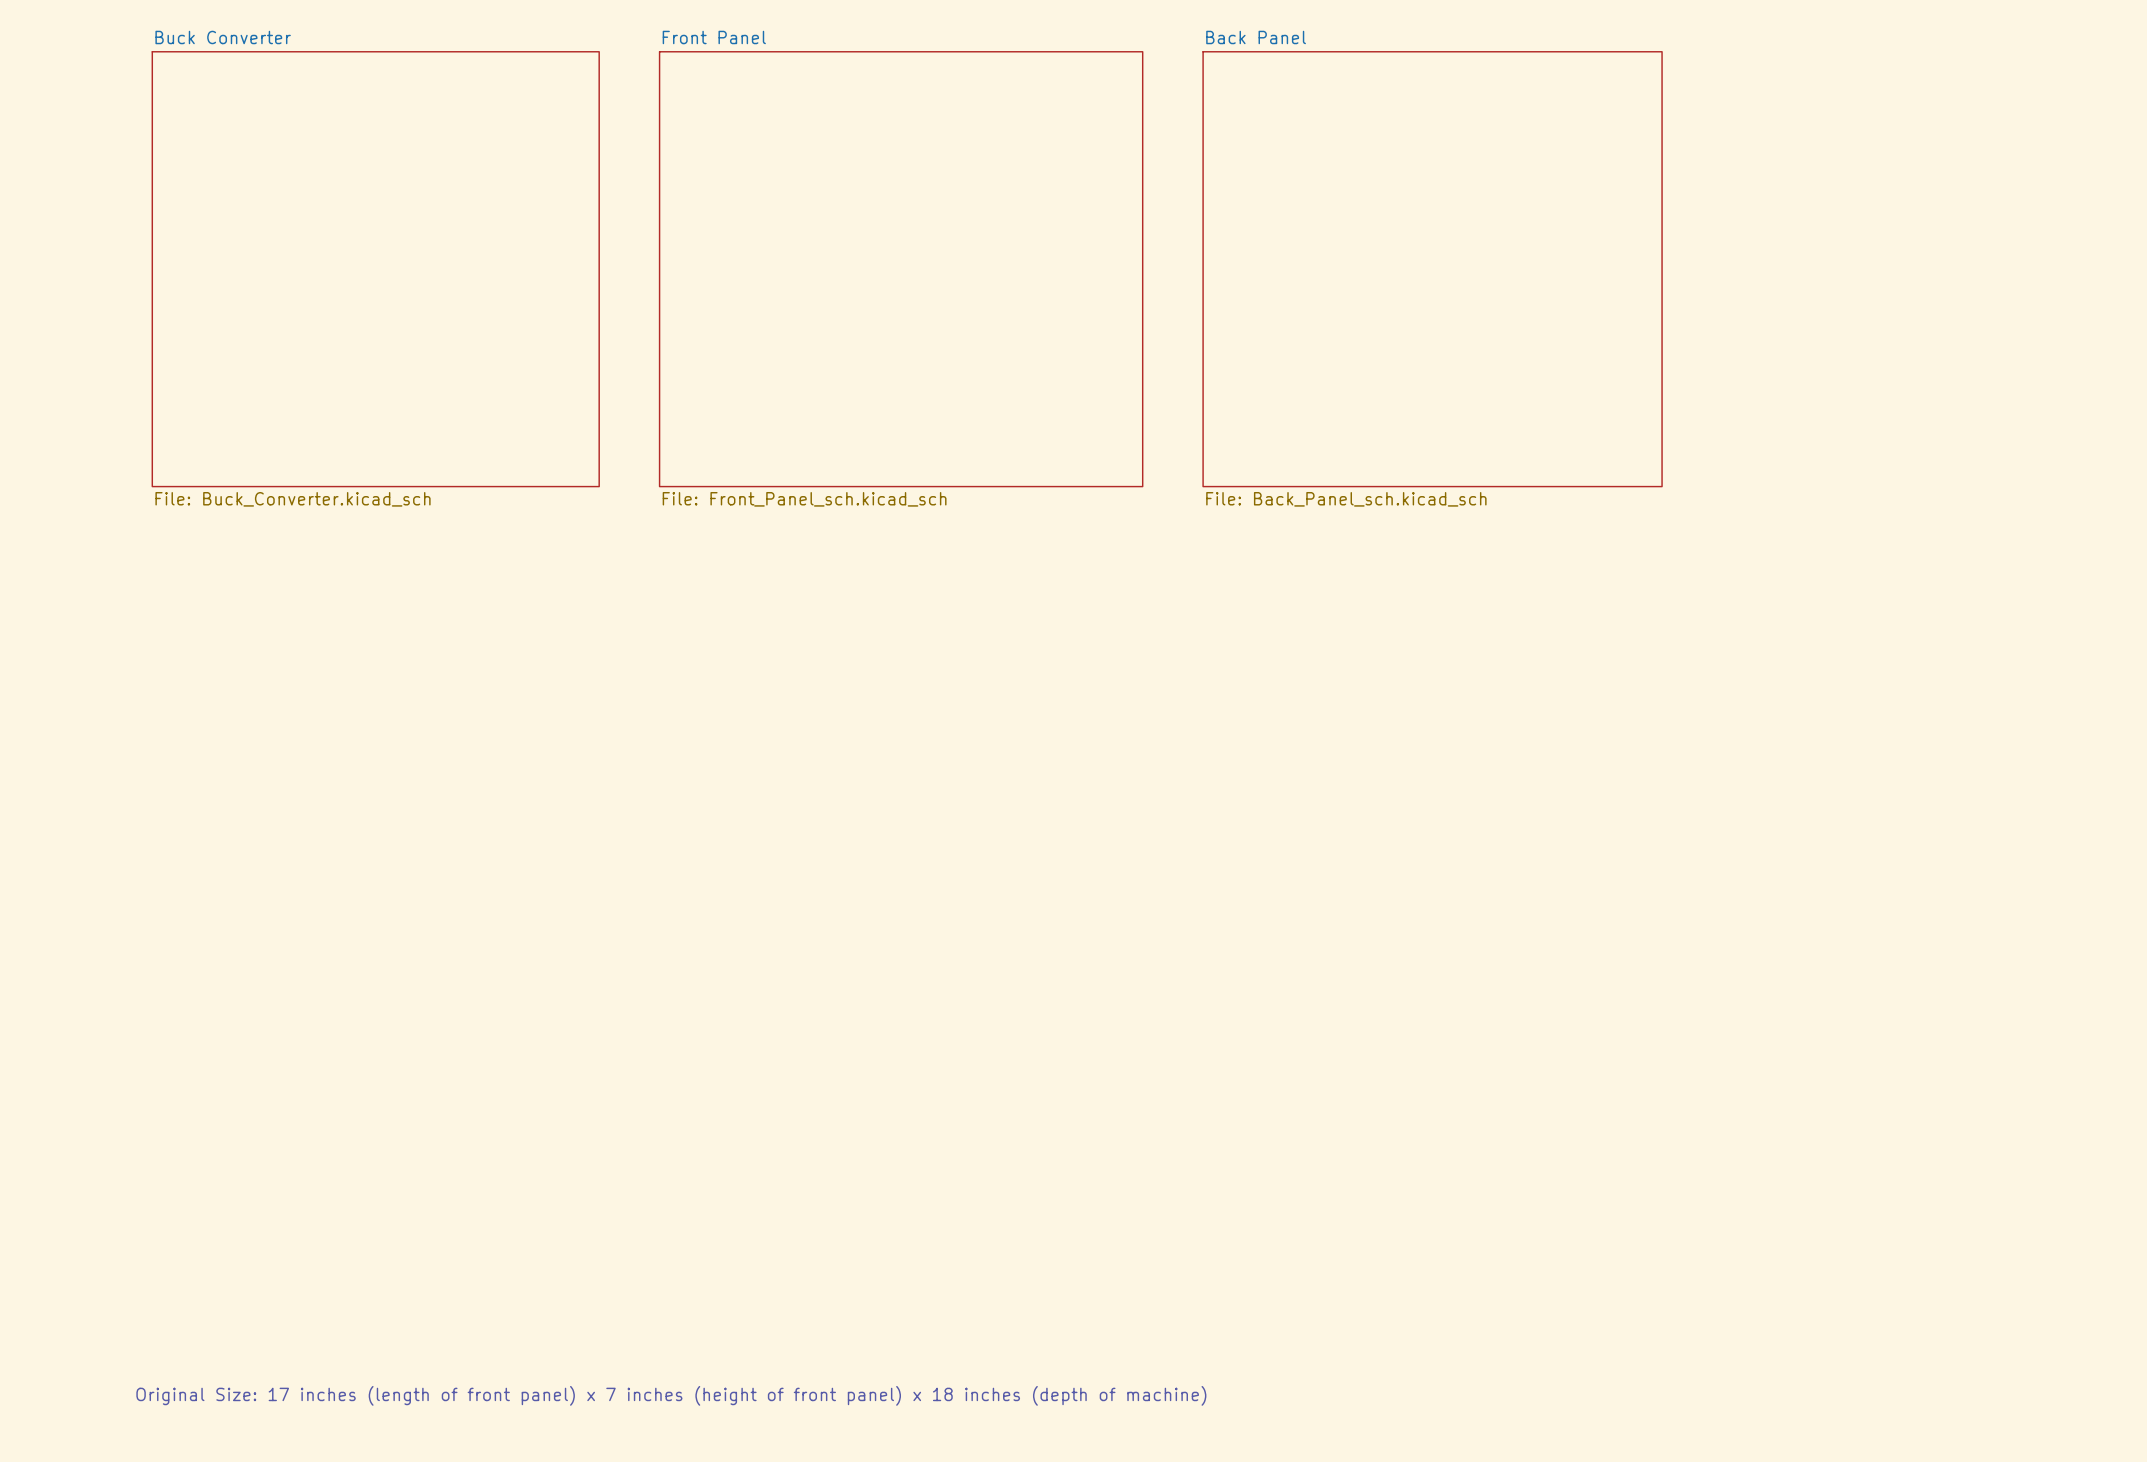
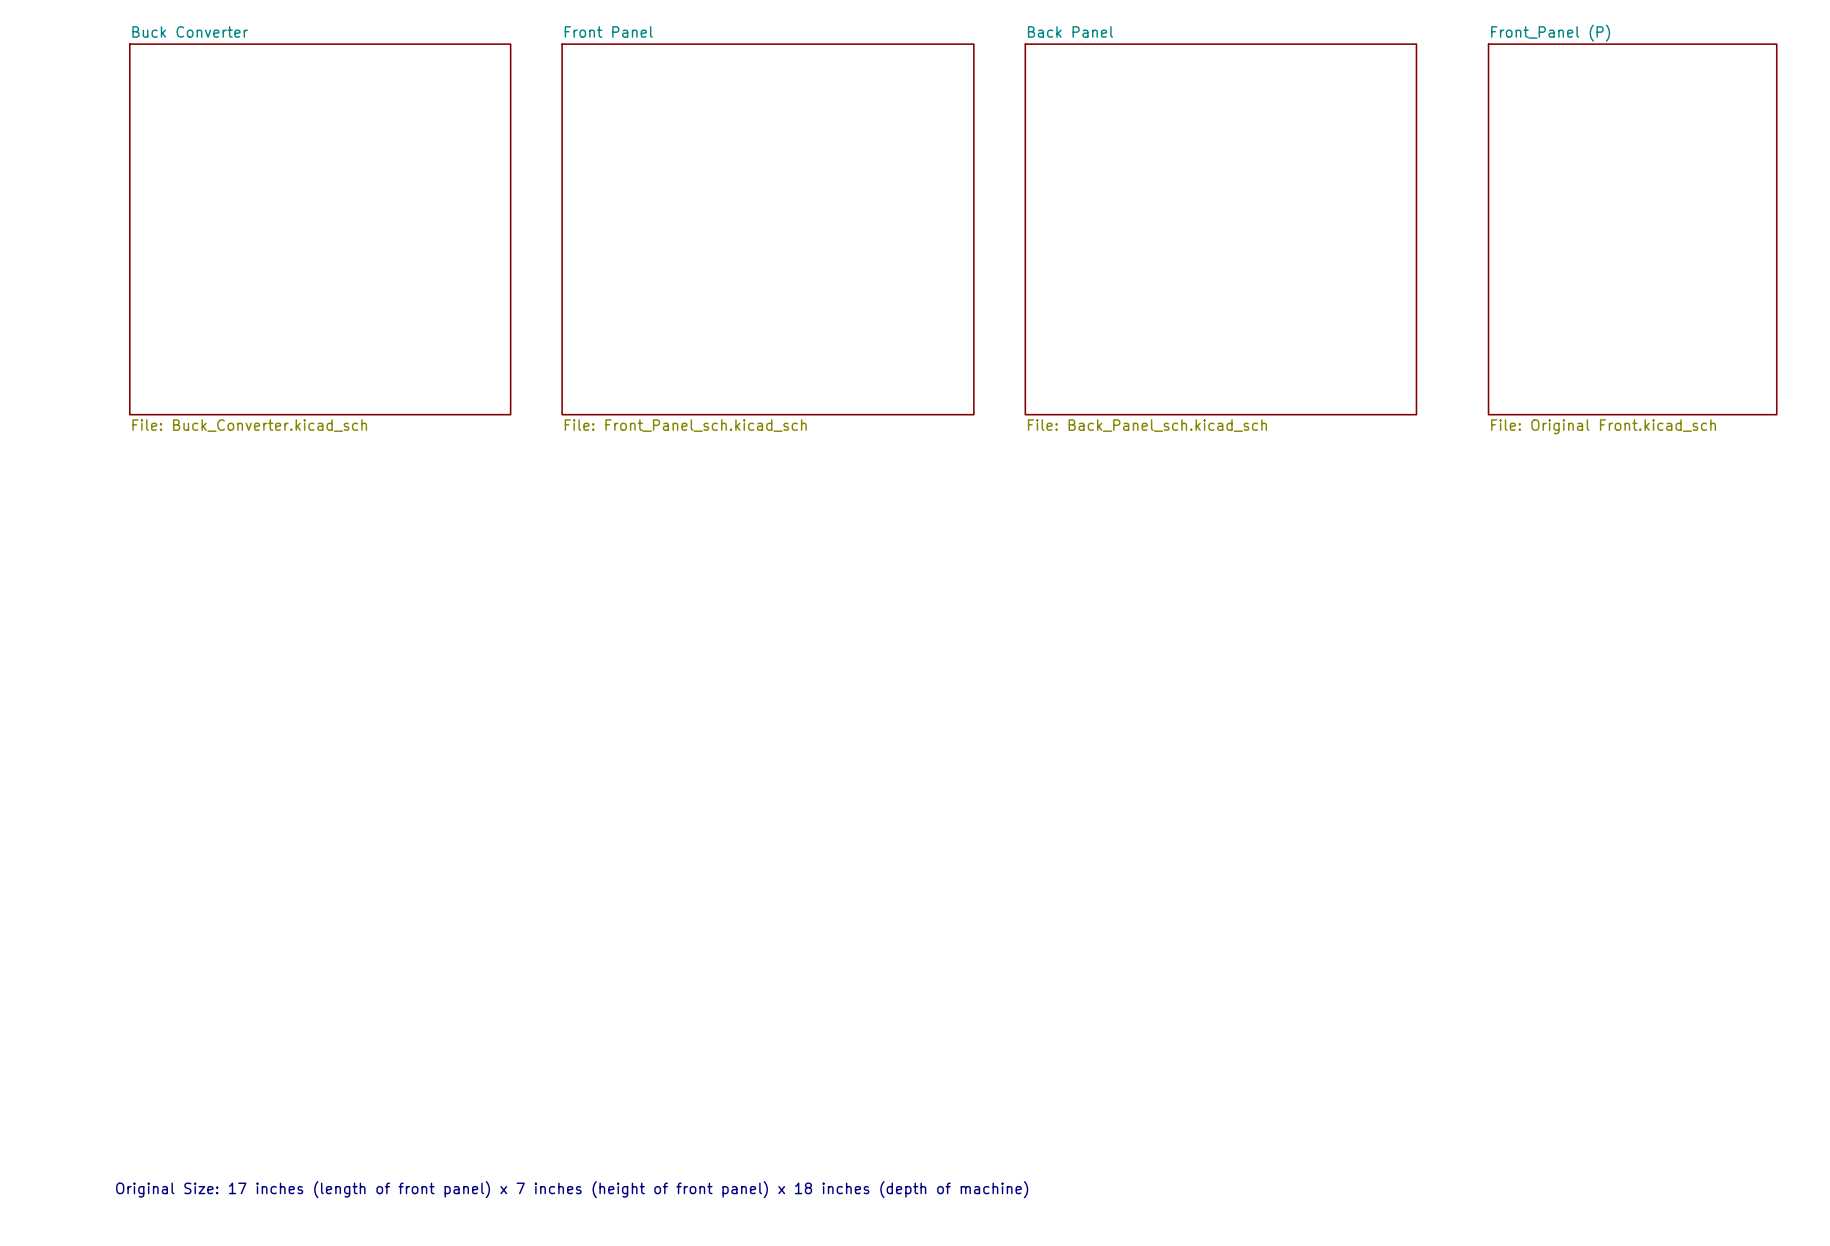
sheet Front_Panel (P): none -> File: Original Front.kicad_sch (1632, 229)

